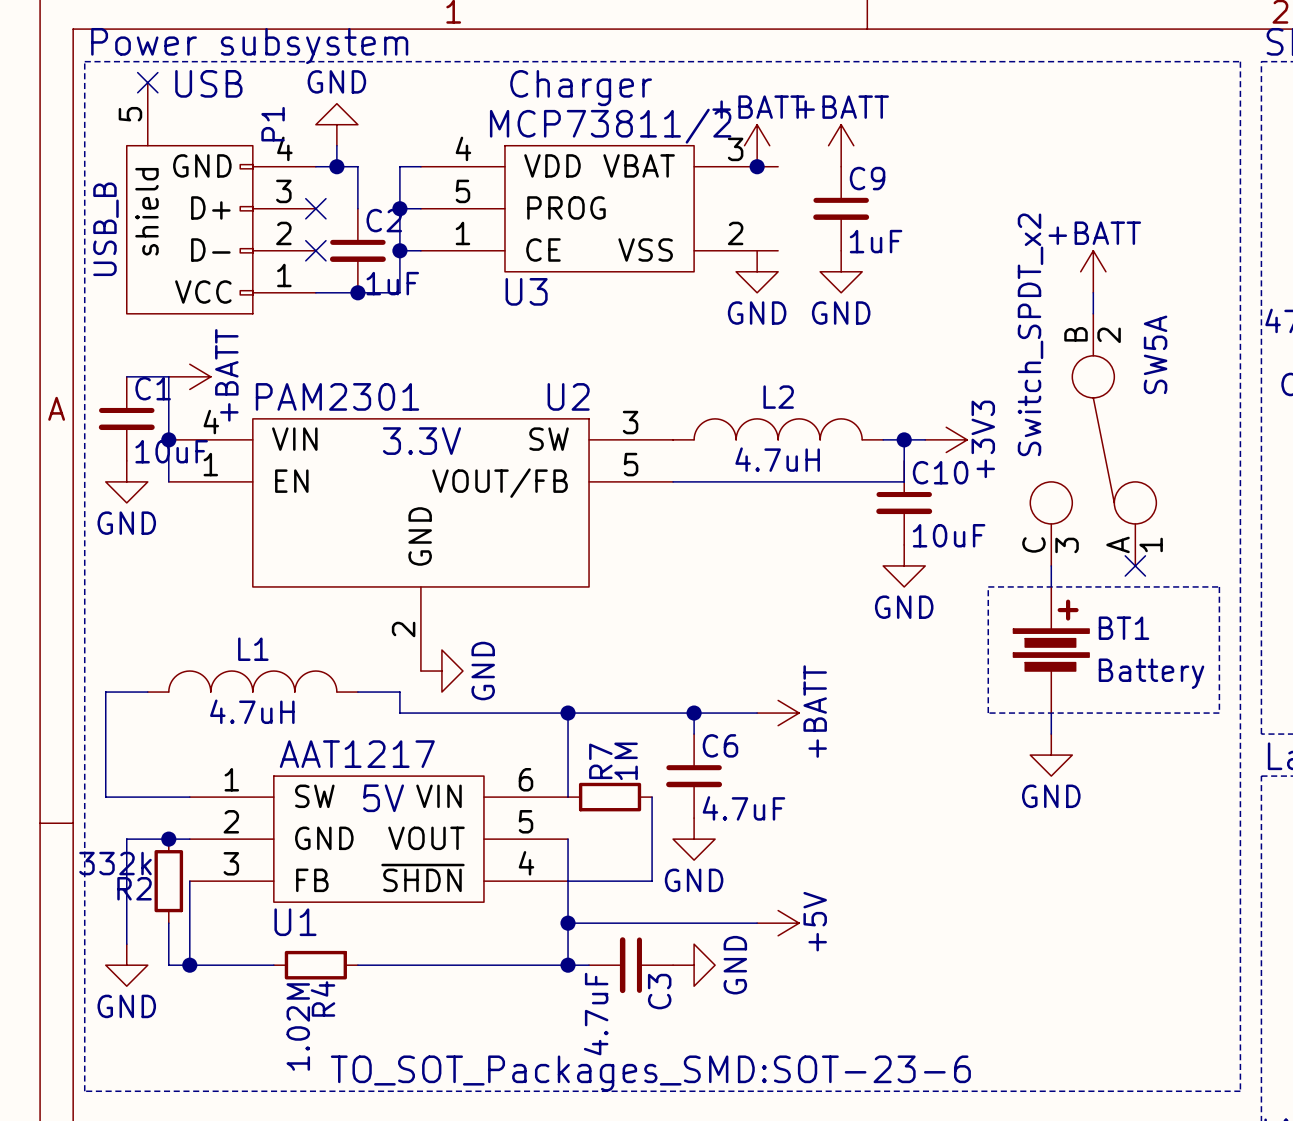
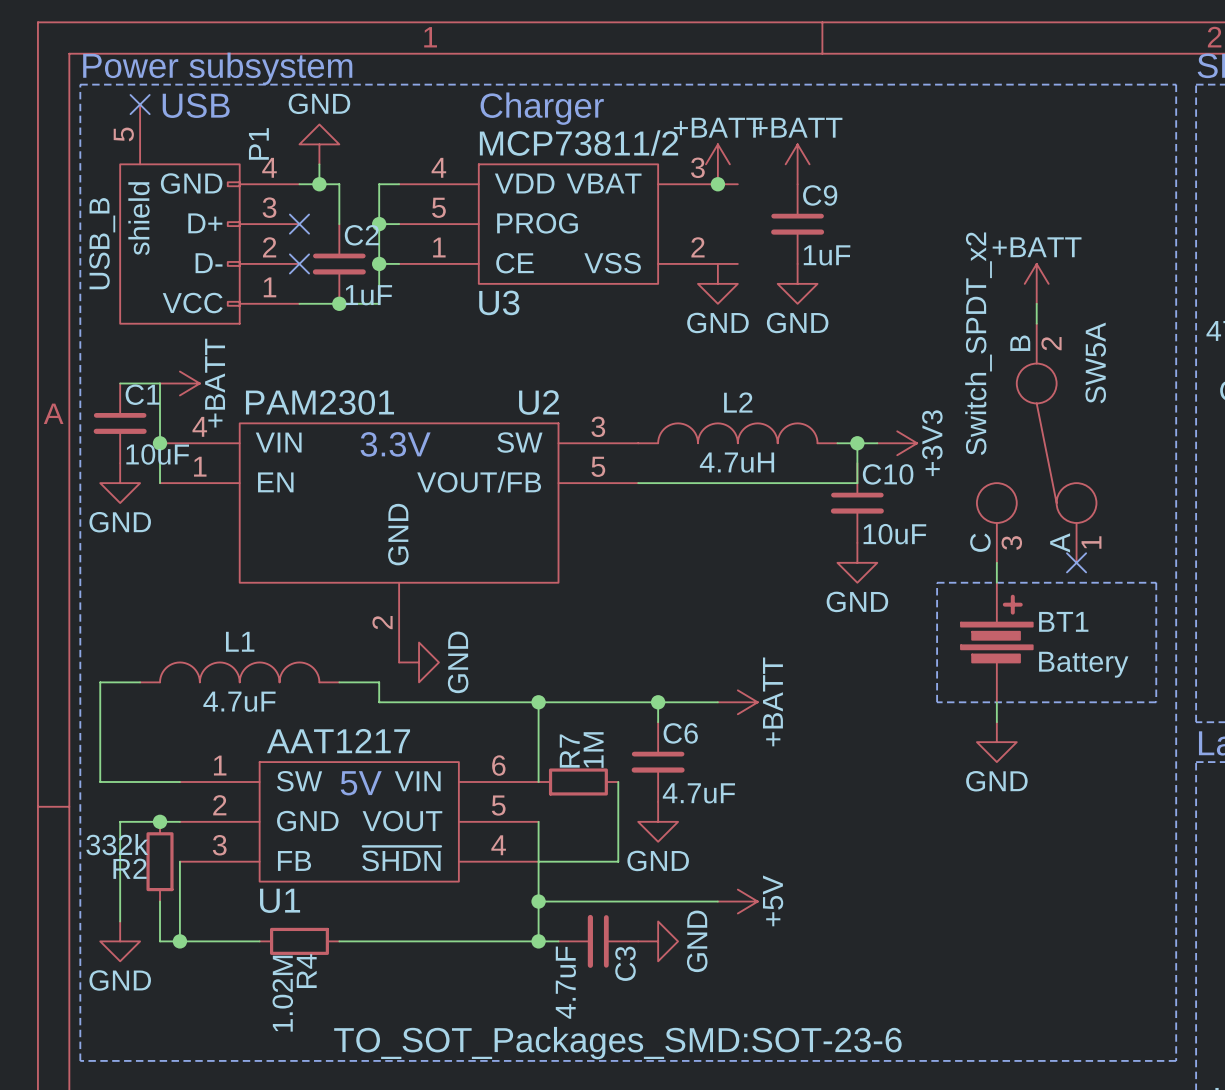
L1 value: 4.7uH (252, 711) -> 4.7uF (239, 701)

